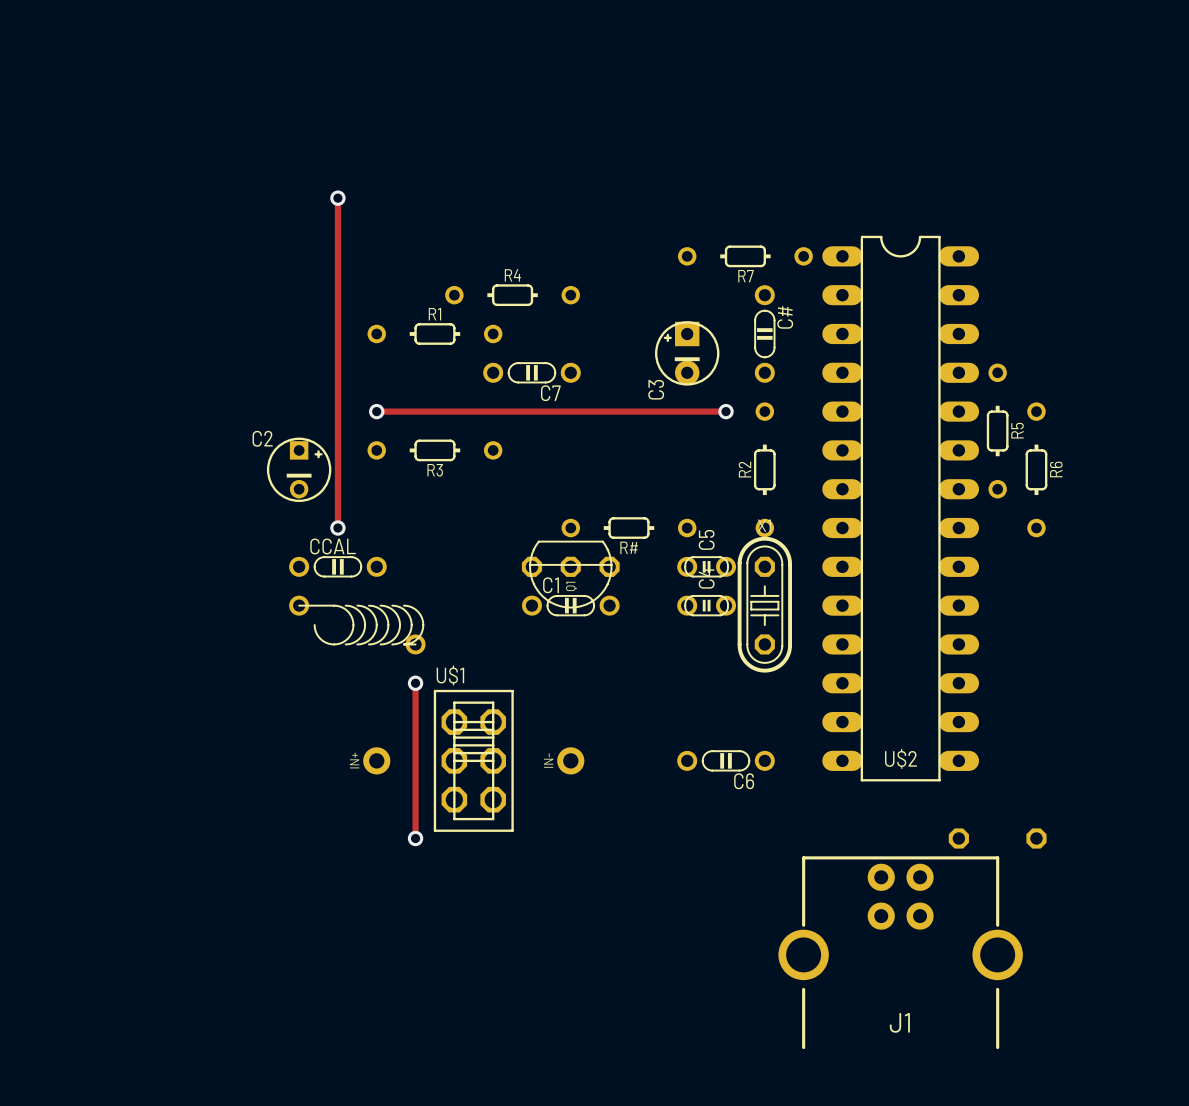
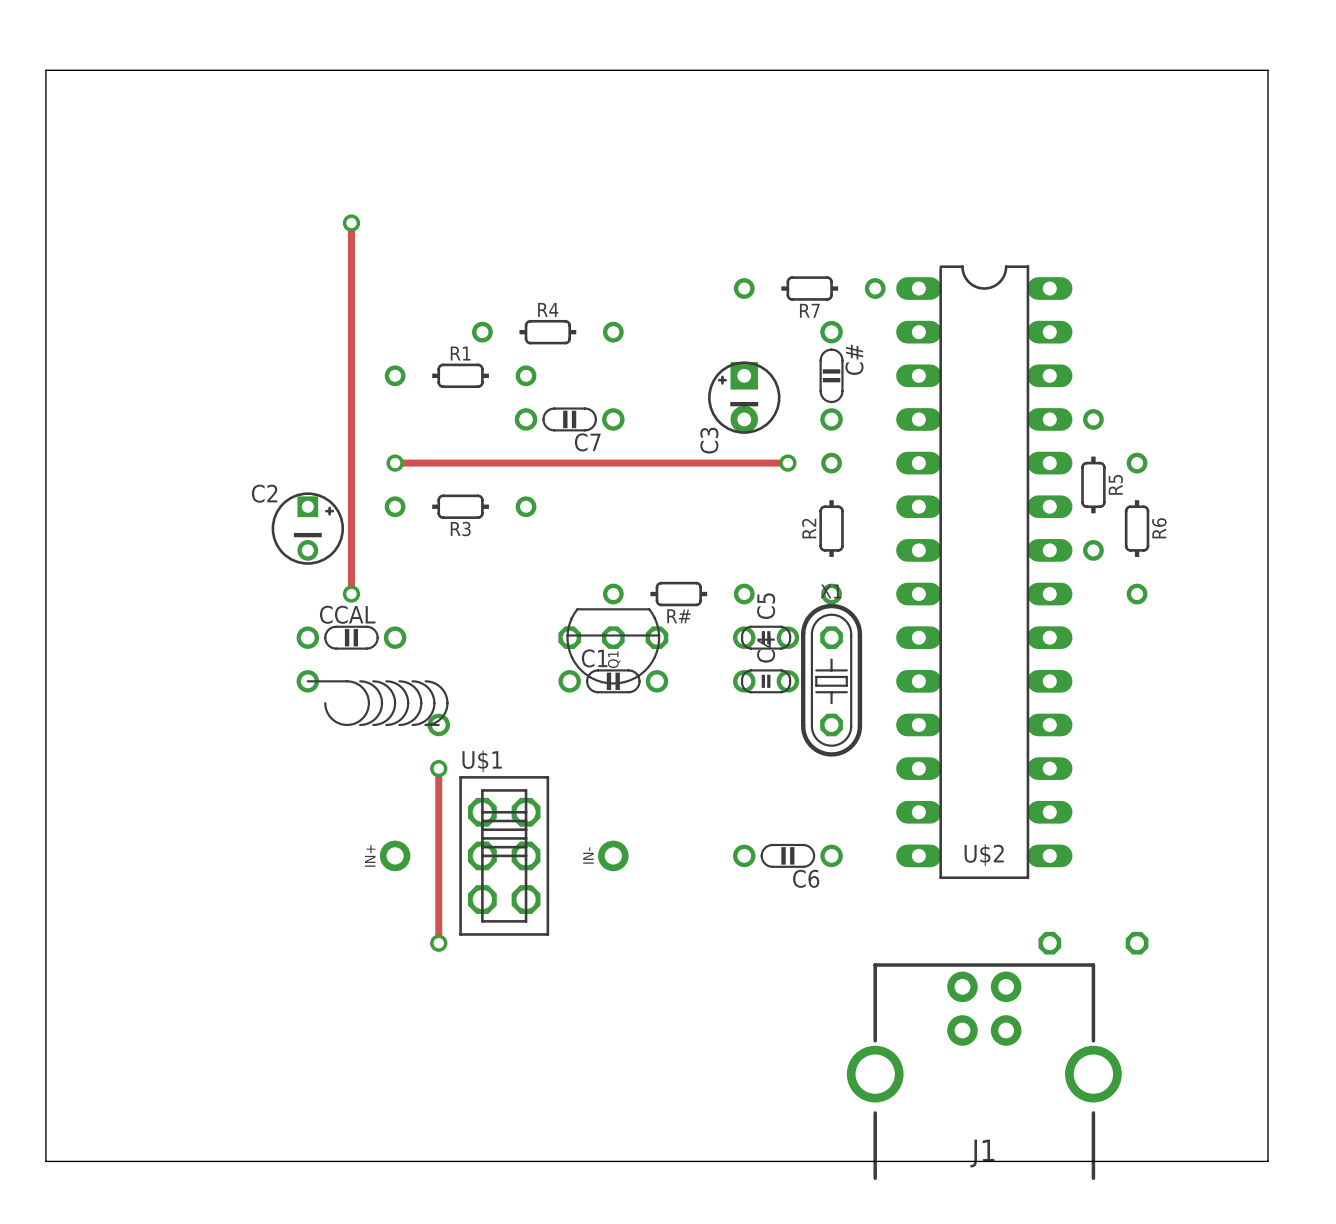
board edge: none -> (45, 70) (1268, 70) (1268, 1161) (45, 1161) (45, 70)

